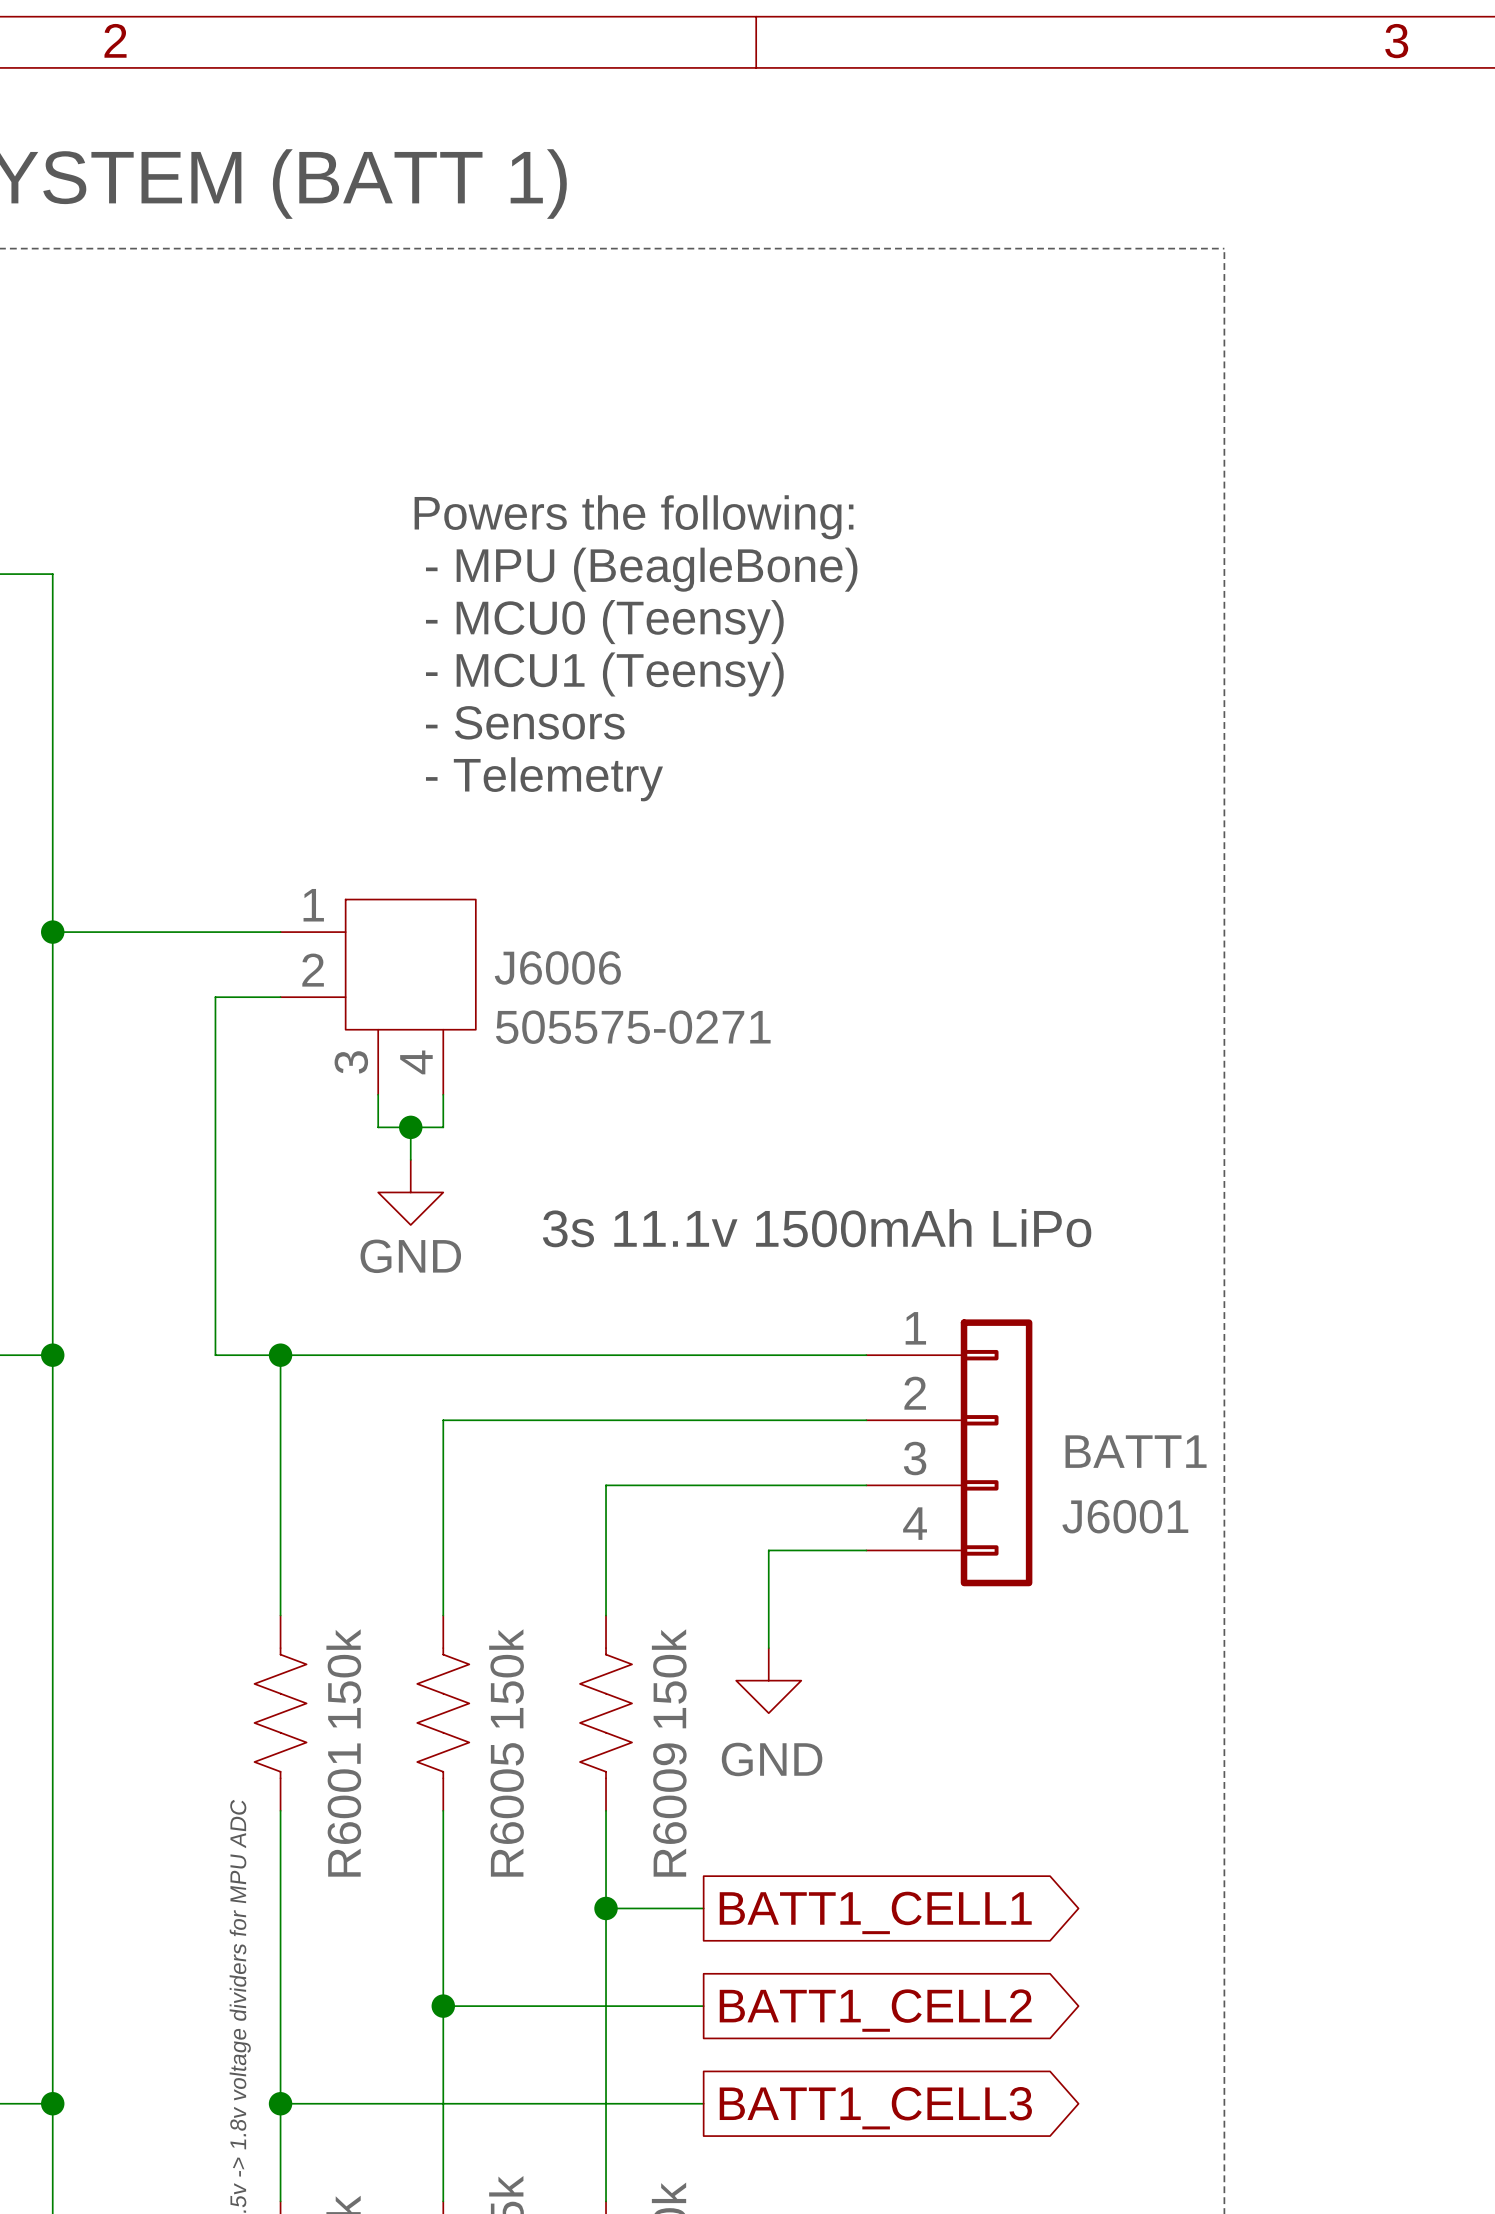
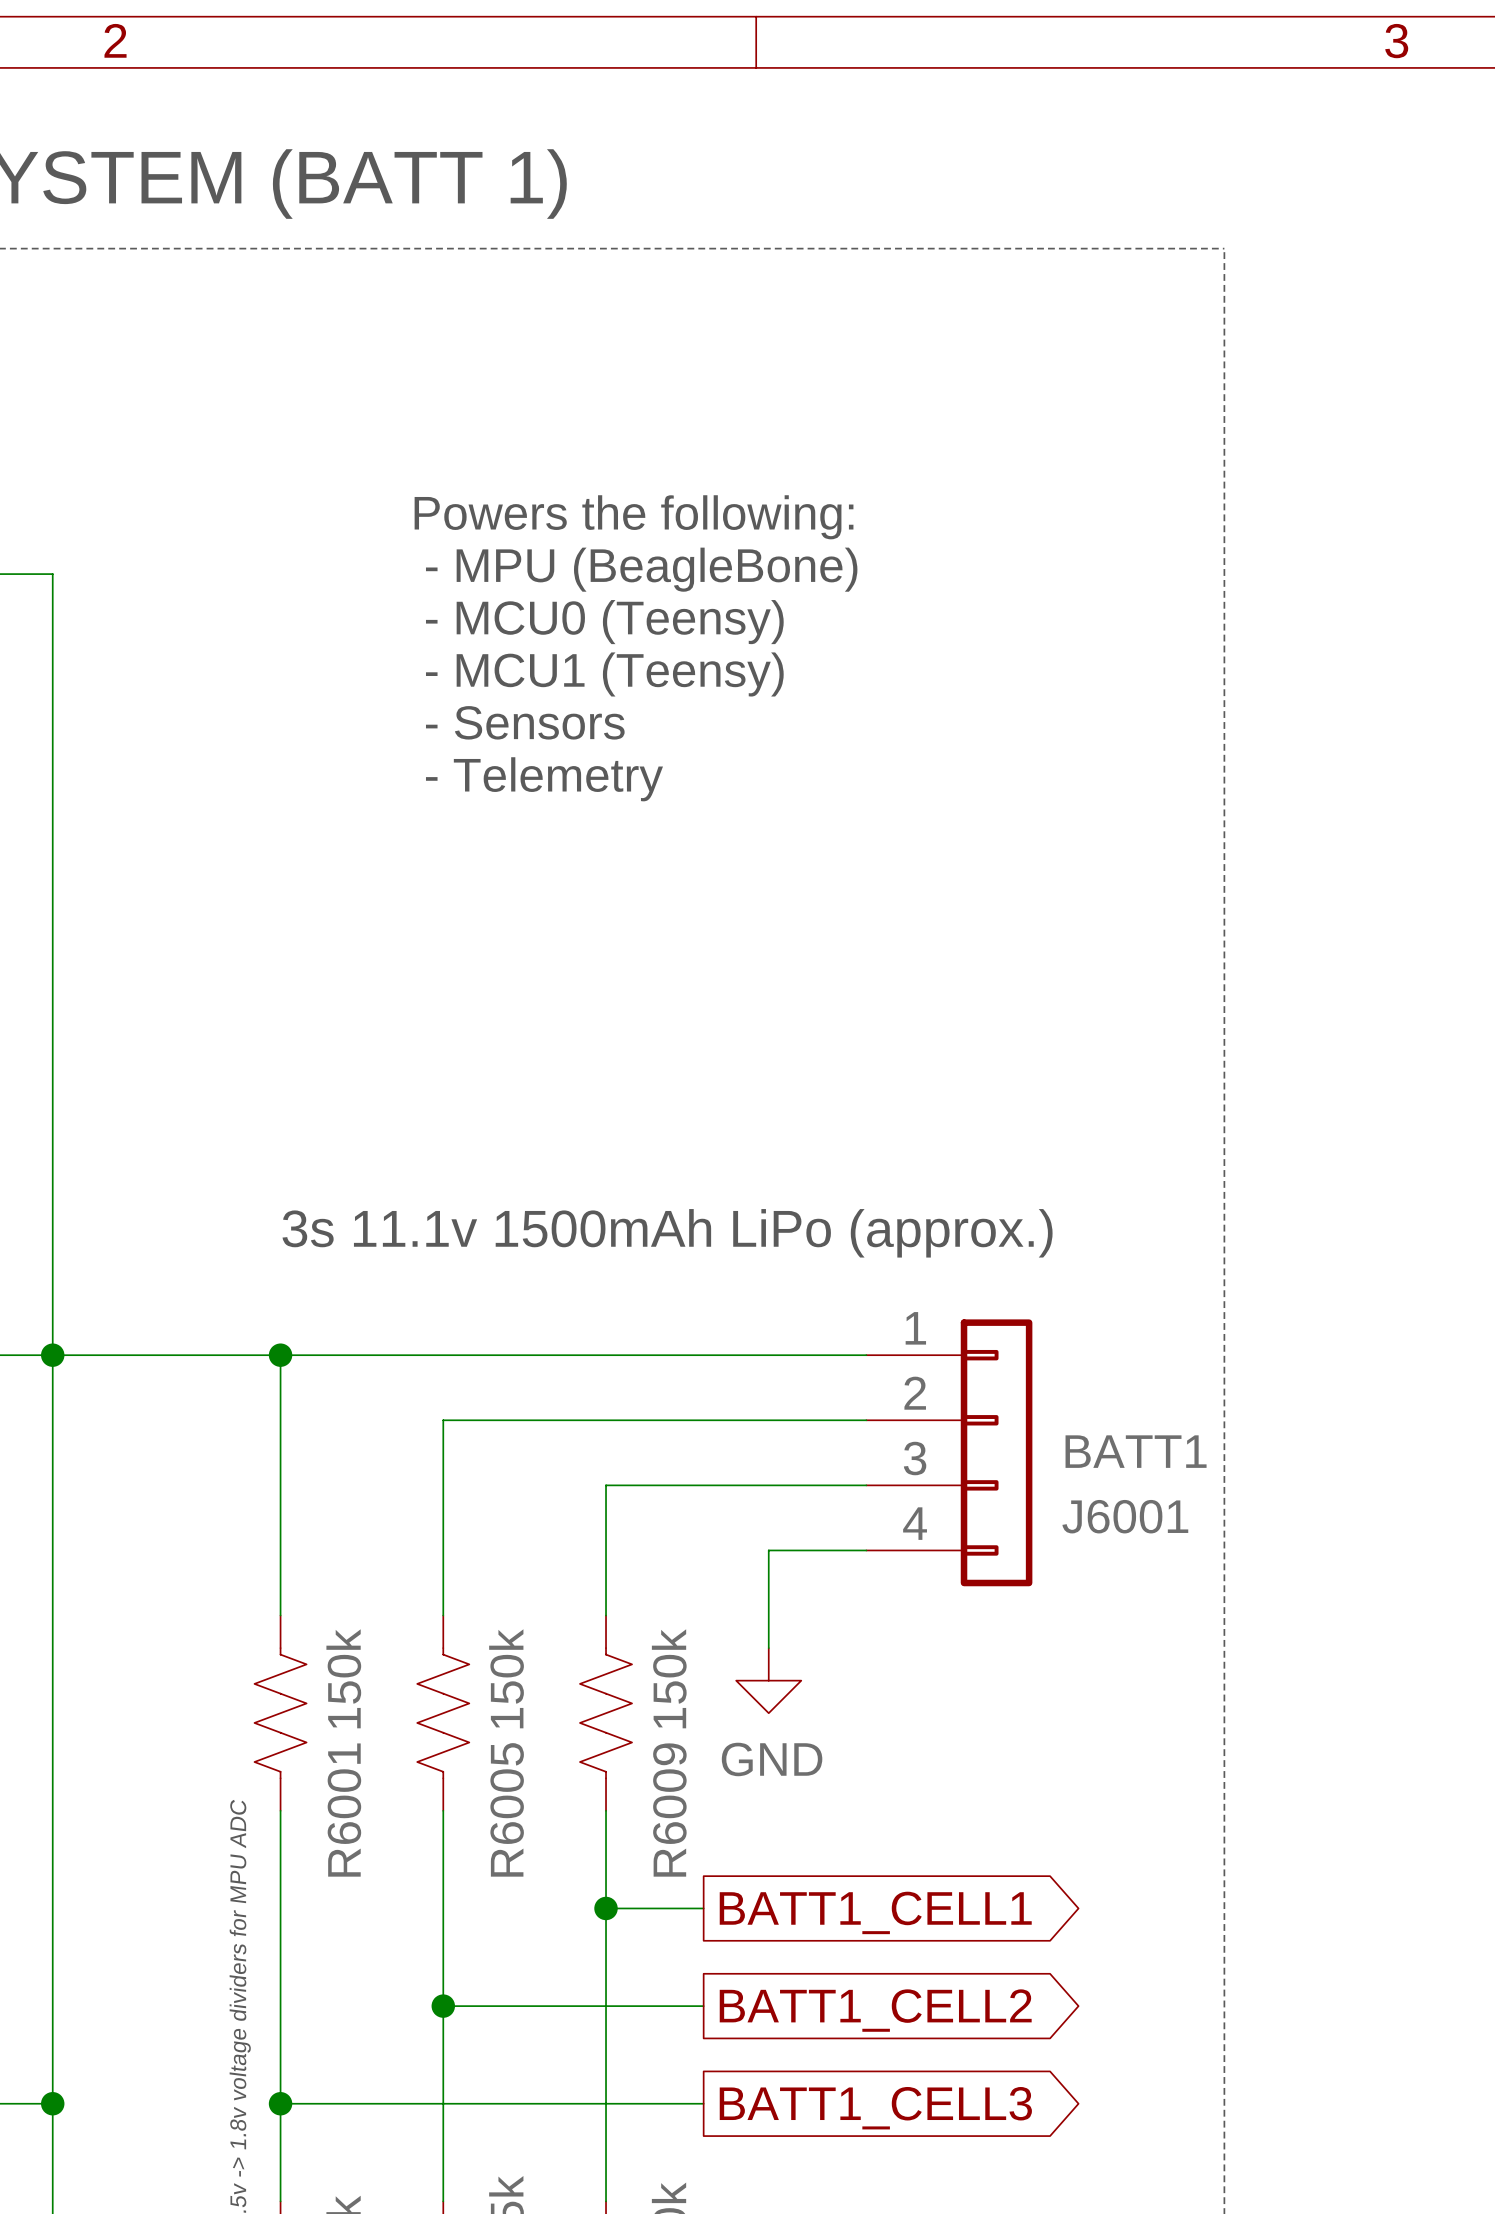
wire: (52, 932) (280, 932) -> none
junction: (52, 932) -> none
wire: (280, 997) (215, 997) (215, 1355) -> (52, 1355) (215, 1355)
J6006: 505575-0271 (378, 997) -> none
wire: (378, 1094) (378, 1127) (443, 1127) (443, 1094) -> none
wire: (410, 1127) (410, 1159) -> none
junction: (410, 1127) -> none
power symbol: GND (410, 1192) -> none
text: 3s 11.1v 1500mAh LiPo (817, 1228) -> 3s 11.1v 1500mAh LiPo (approx.) (667, 1233)

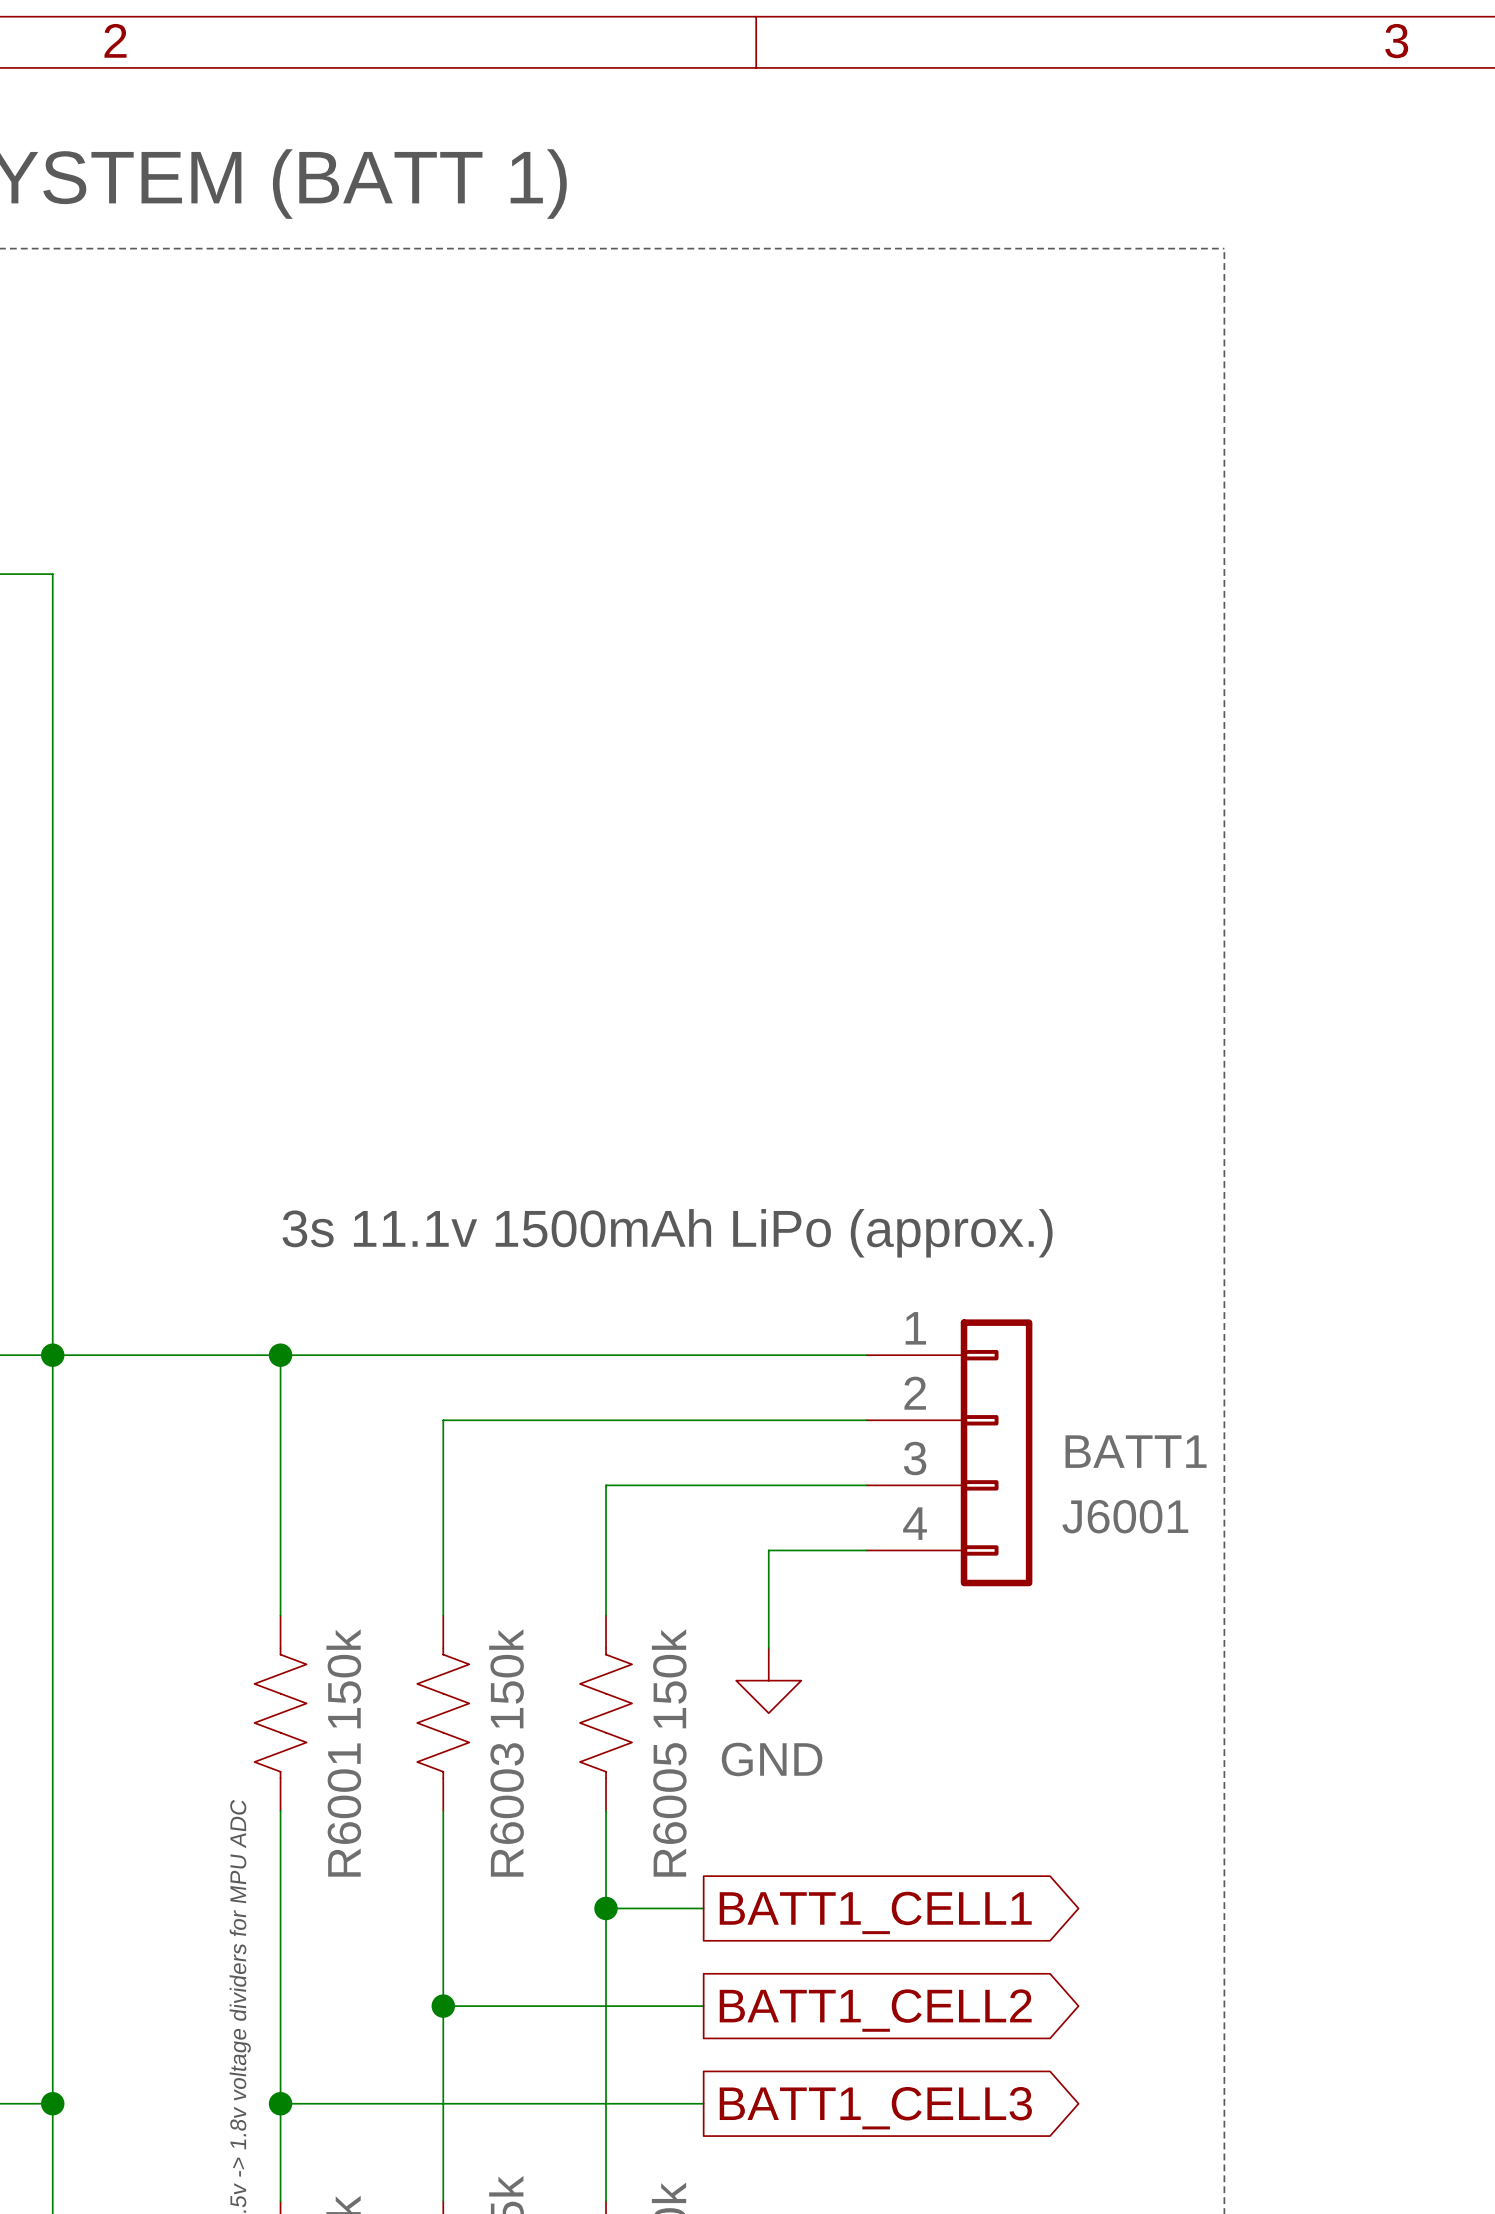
text: Powers the following: (634, 517) -> none
text: - MPU (BeagleBone) (641, 569) -> none
text: - MCU0 (Teensy) (604, 622) -> none
text: - MCU1 (Teensy) (604, 674) -> none
text: - Sensors (525, 722) -> none
text: - Telemetry (544, 779) -> none
R6005 name: R6005 (507, 1809) -> R6003 (507, 1809)
R6009 name: R6009 (669, 1810) -> R6005 (669, 1809)

